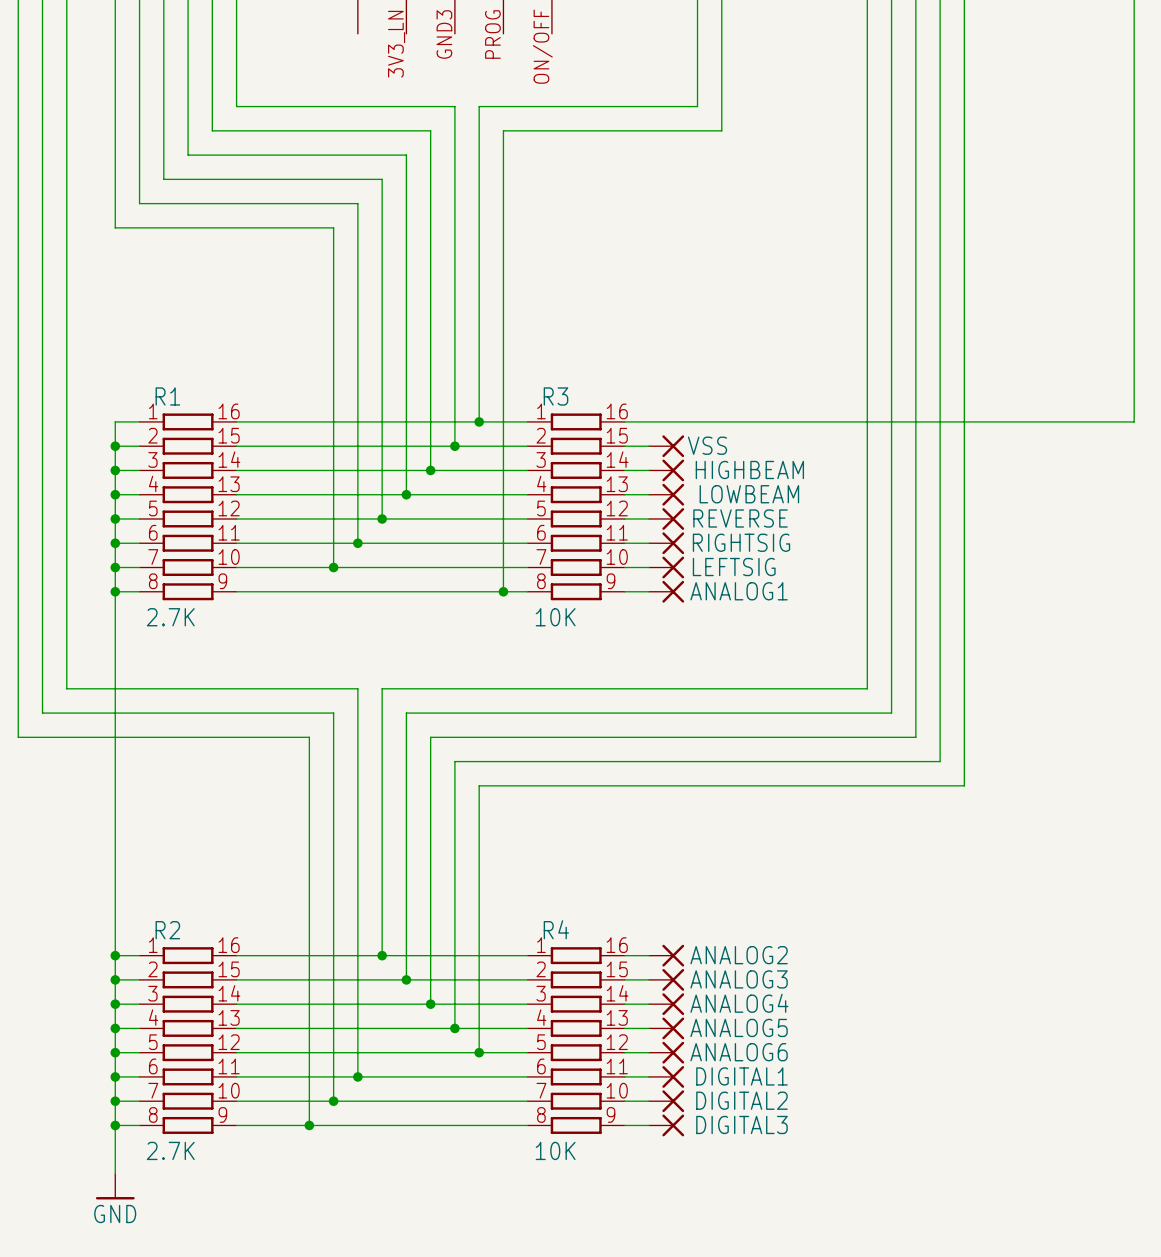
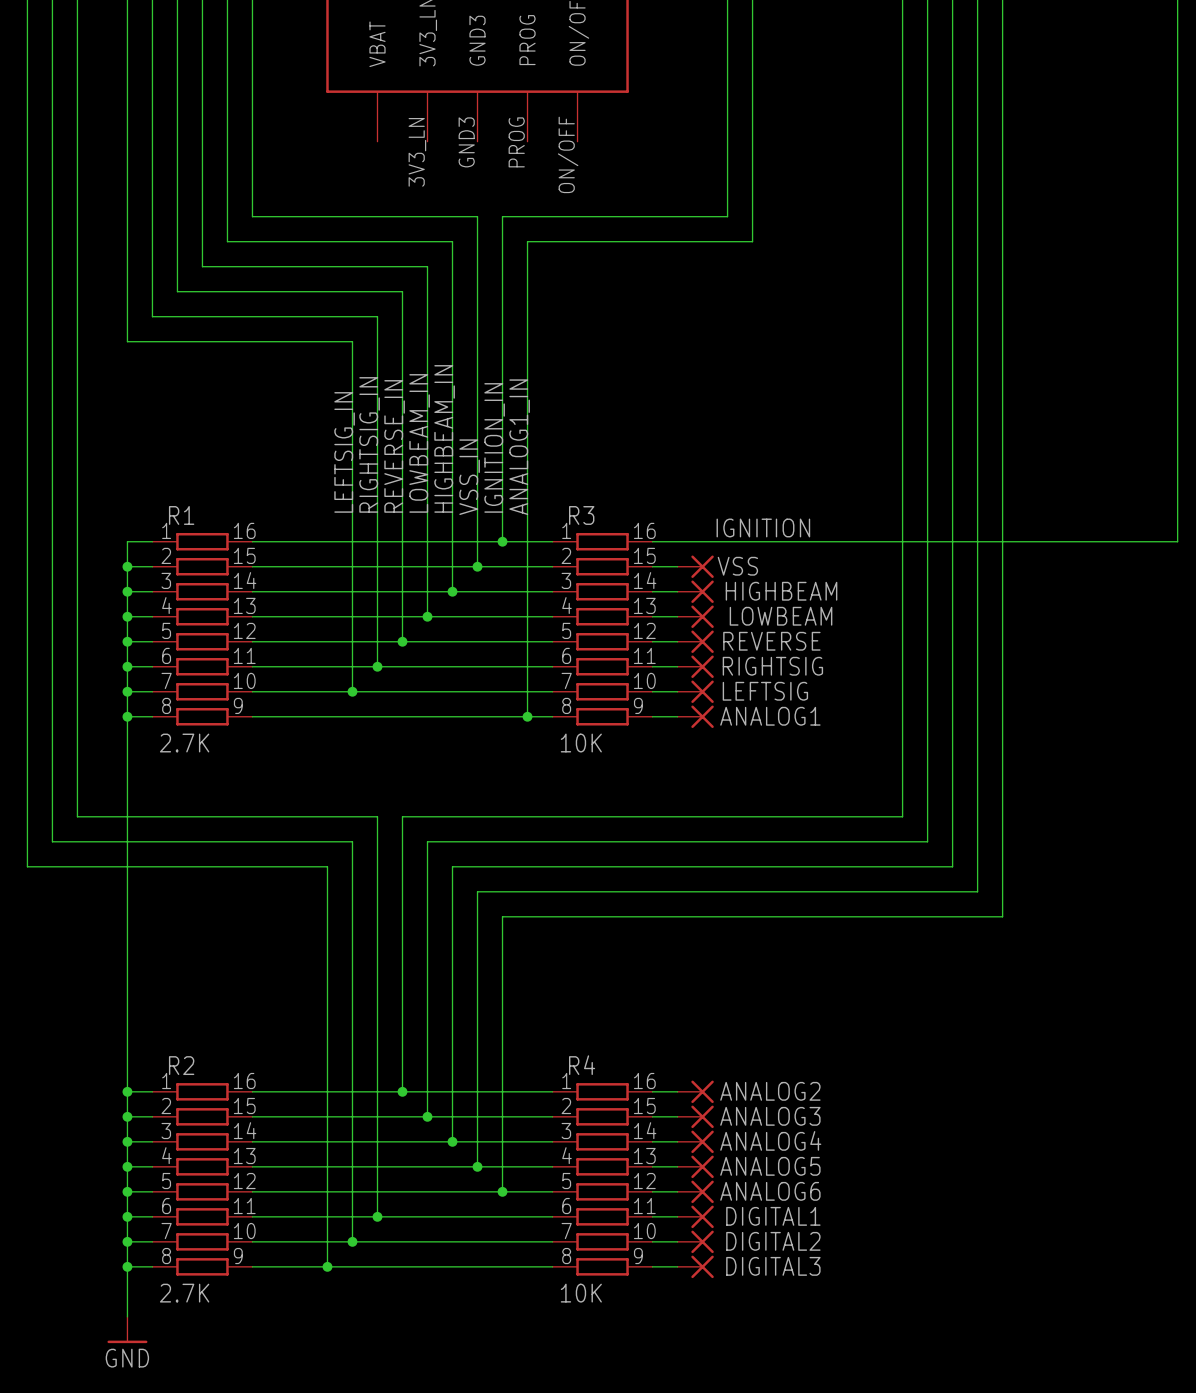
label: none -> HIGHBEAM_IN (444, 438)
label: none -> LOWBEAM_IN (419, 443)
label: none -> RIGHTSIG_IN (369, 444)
label: none -> REVERSE_IN (394, 446)
label: none -> IGNITION_IN (494, 447)
label: none -> ANALOG1_IN (519, 447)
label: none -> LEFTSIG_IN (344, 452)
label: none -> VSS_IN (469, 477)
label: none -> IGNITION (763, 527)

